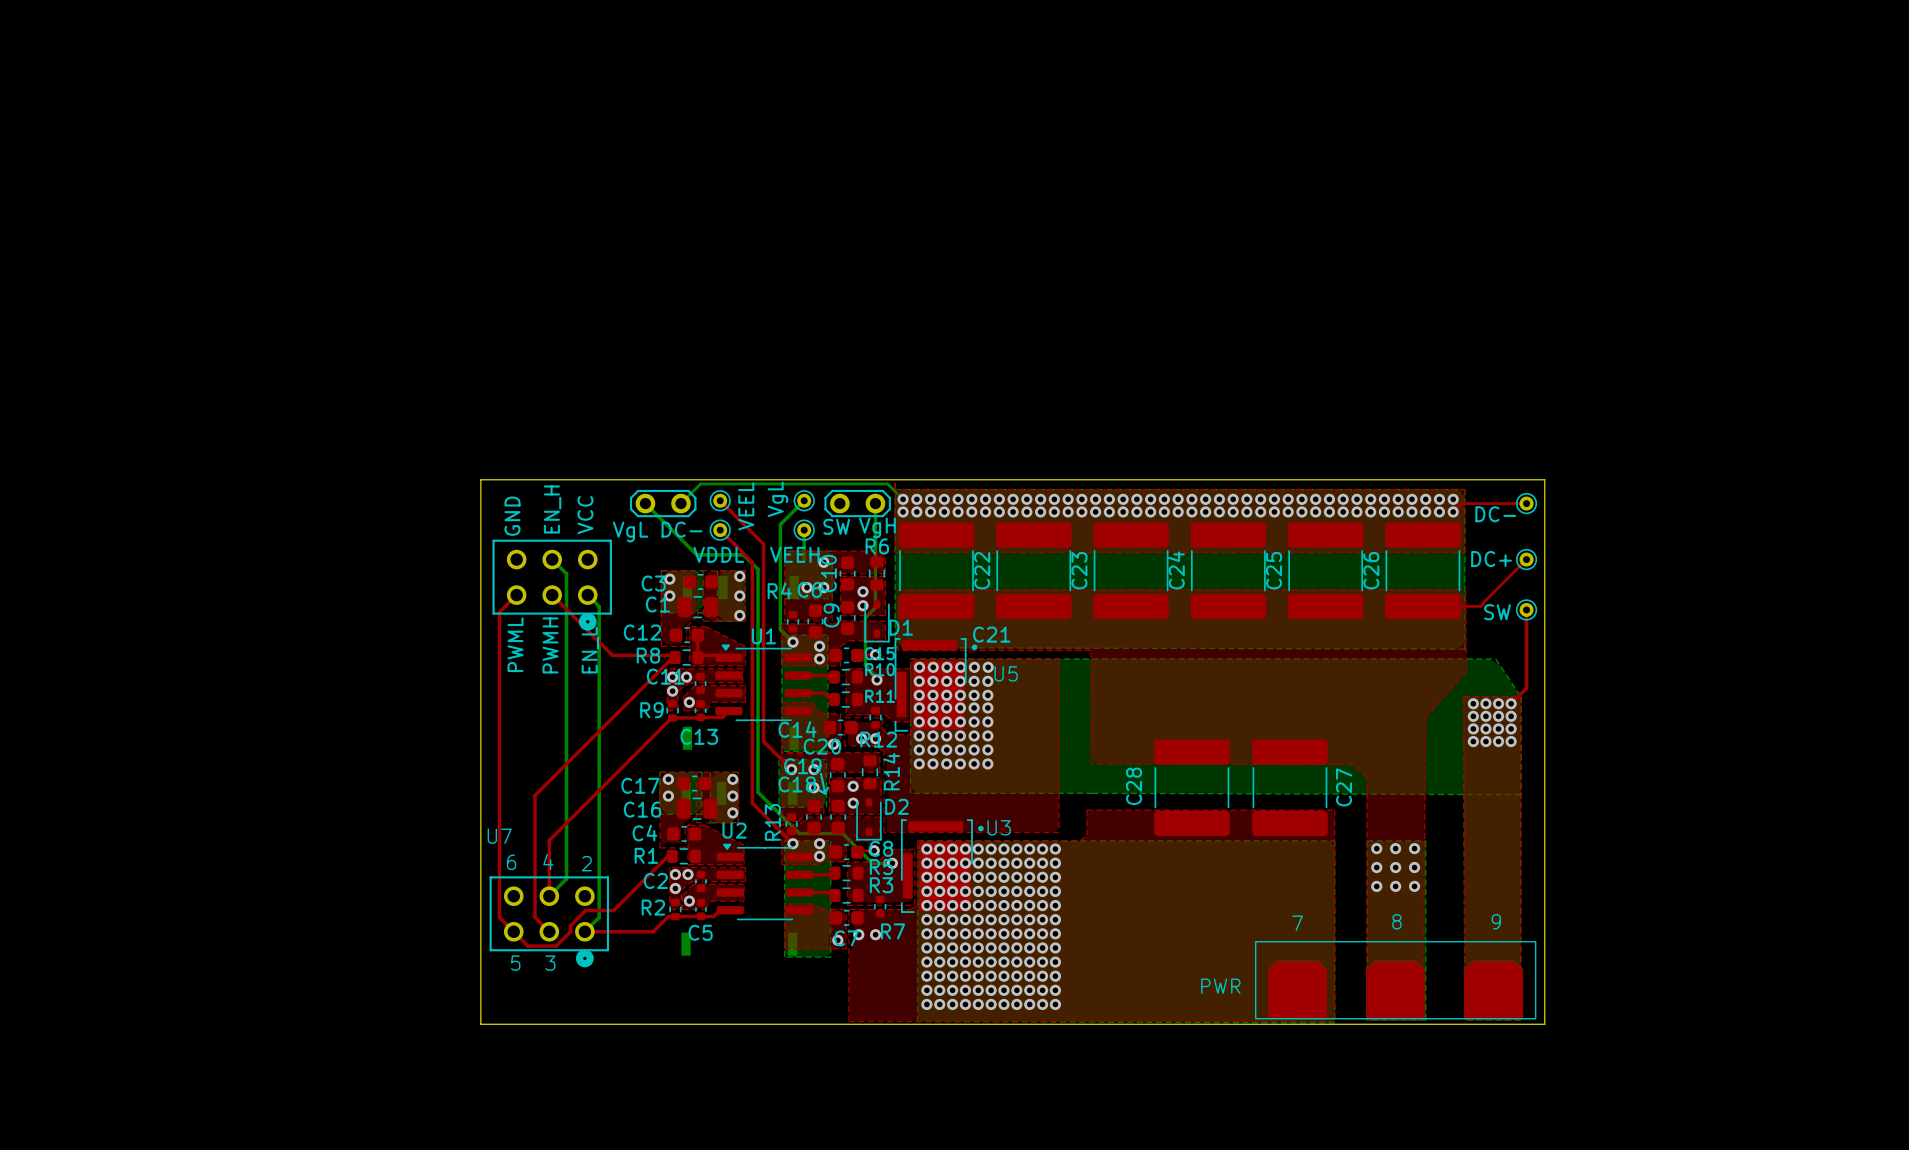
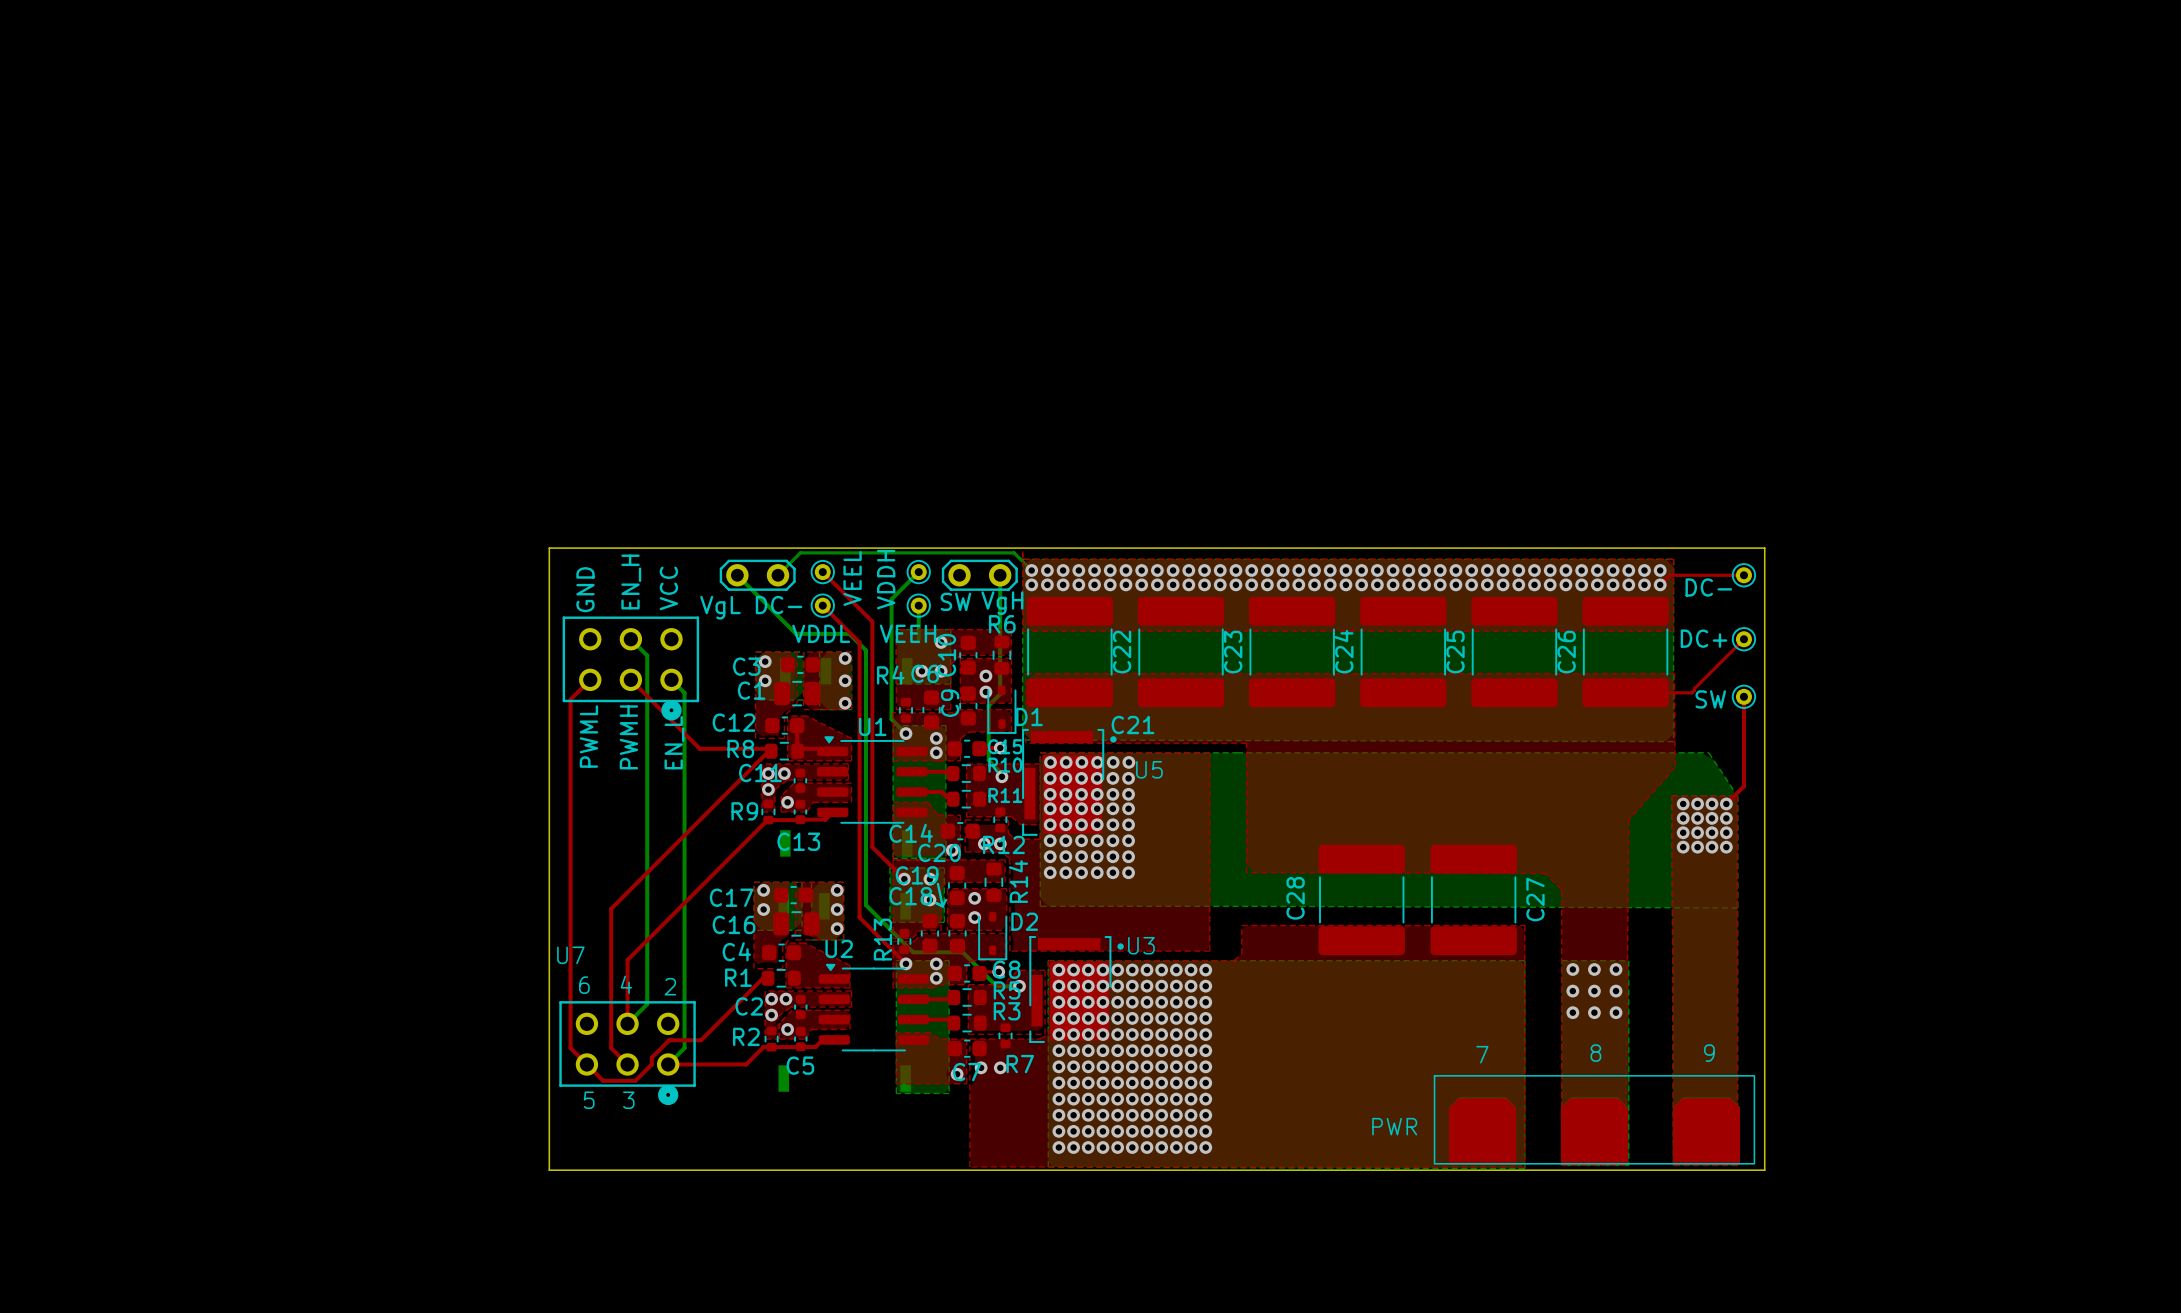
VgL name: VgL (778, 499) -> VDDH (886, 579)

